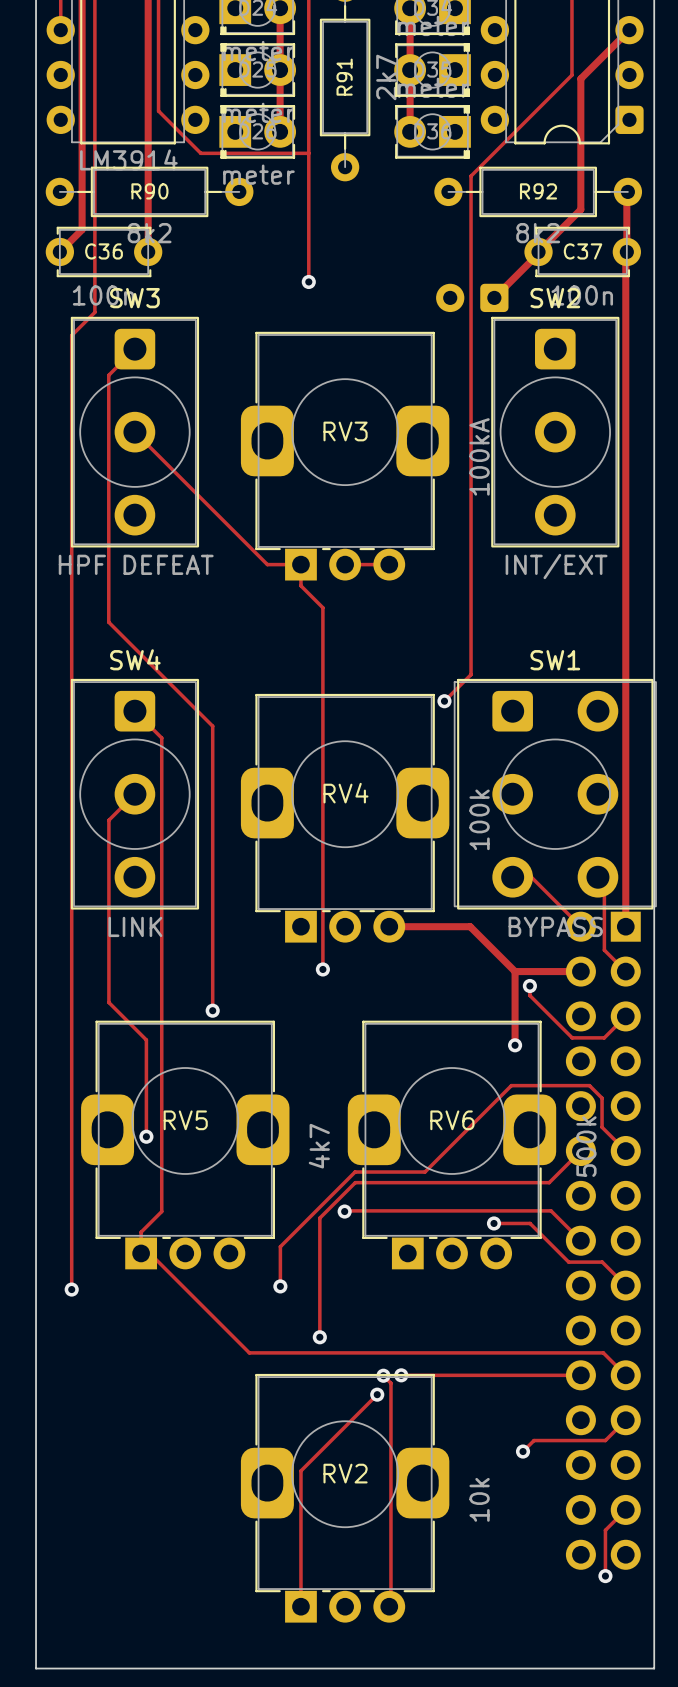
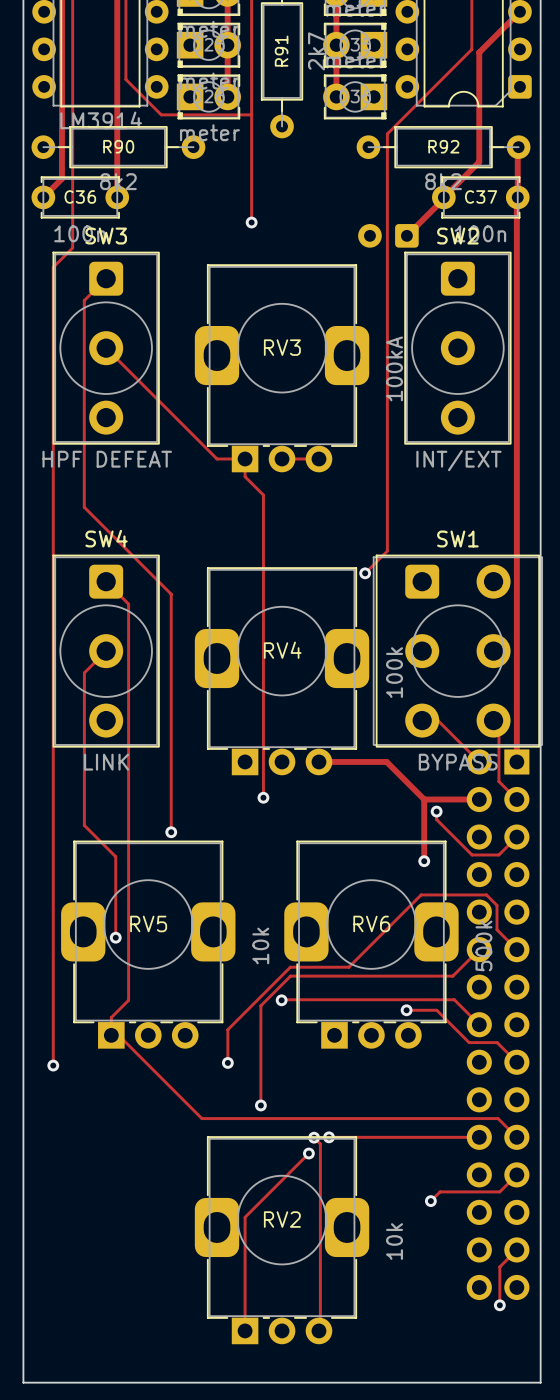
RV5 value: 4k7 (319, 1146) -> 10k (260, 945)

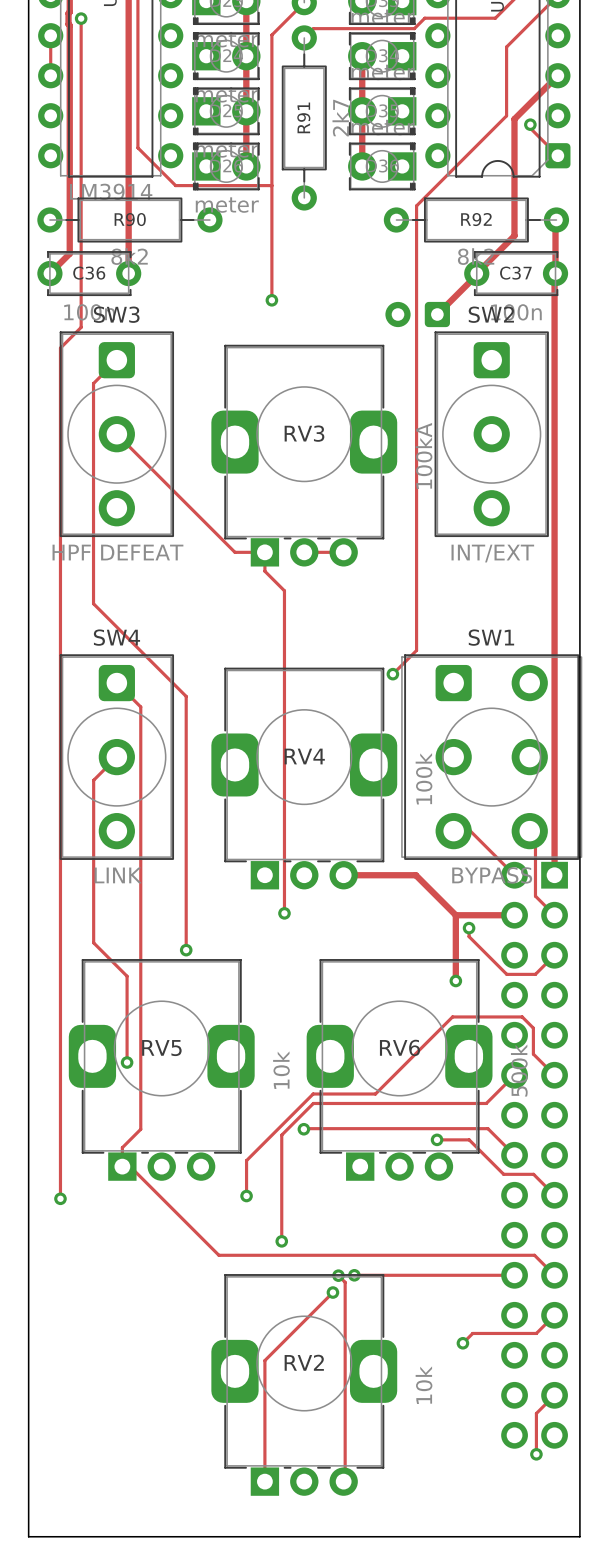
track: none -> (530, 124) (530, 128) (557, 155)
via: none -> (530, 124)

